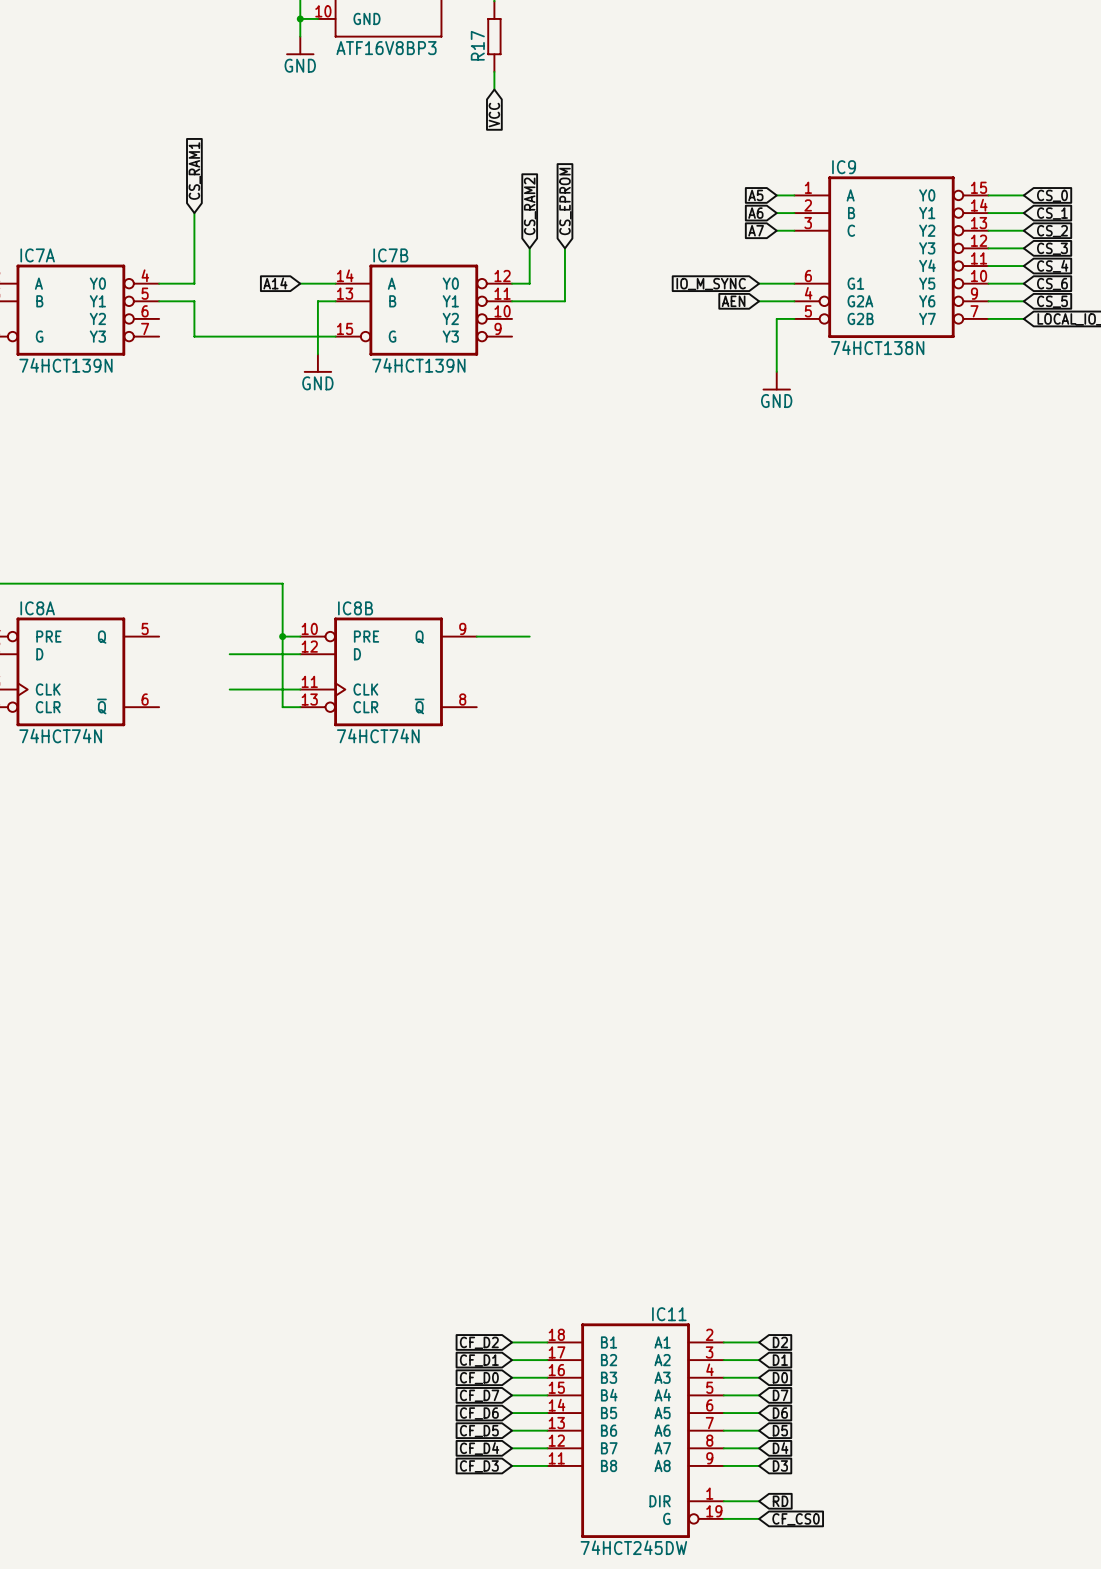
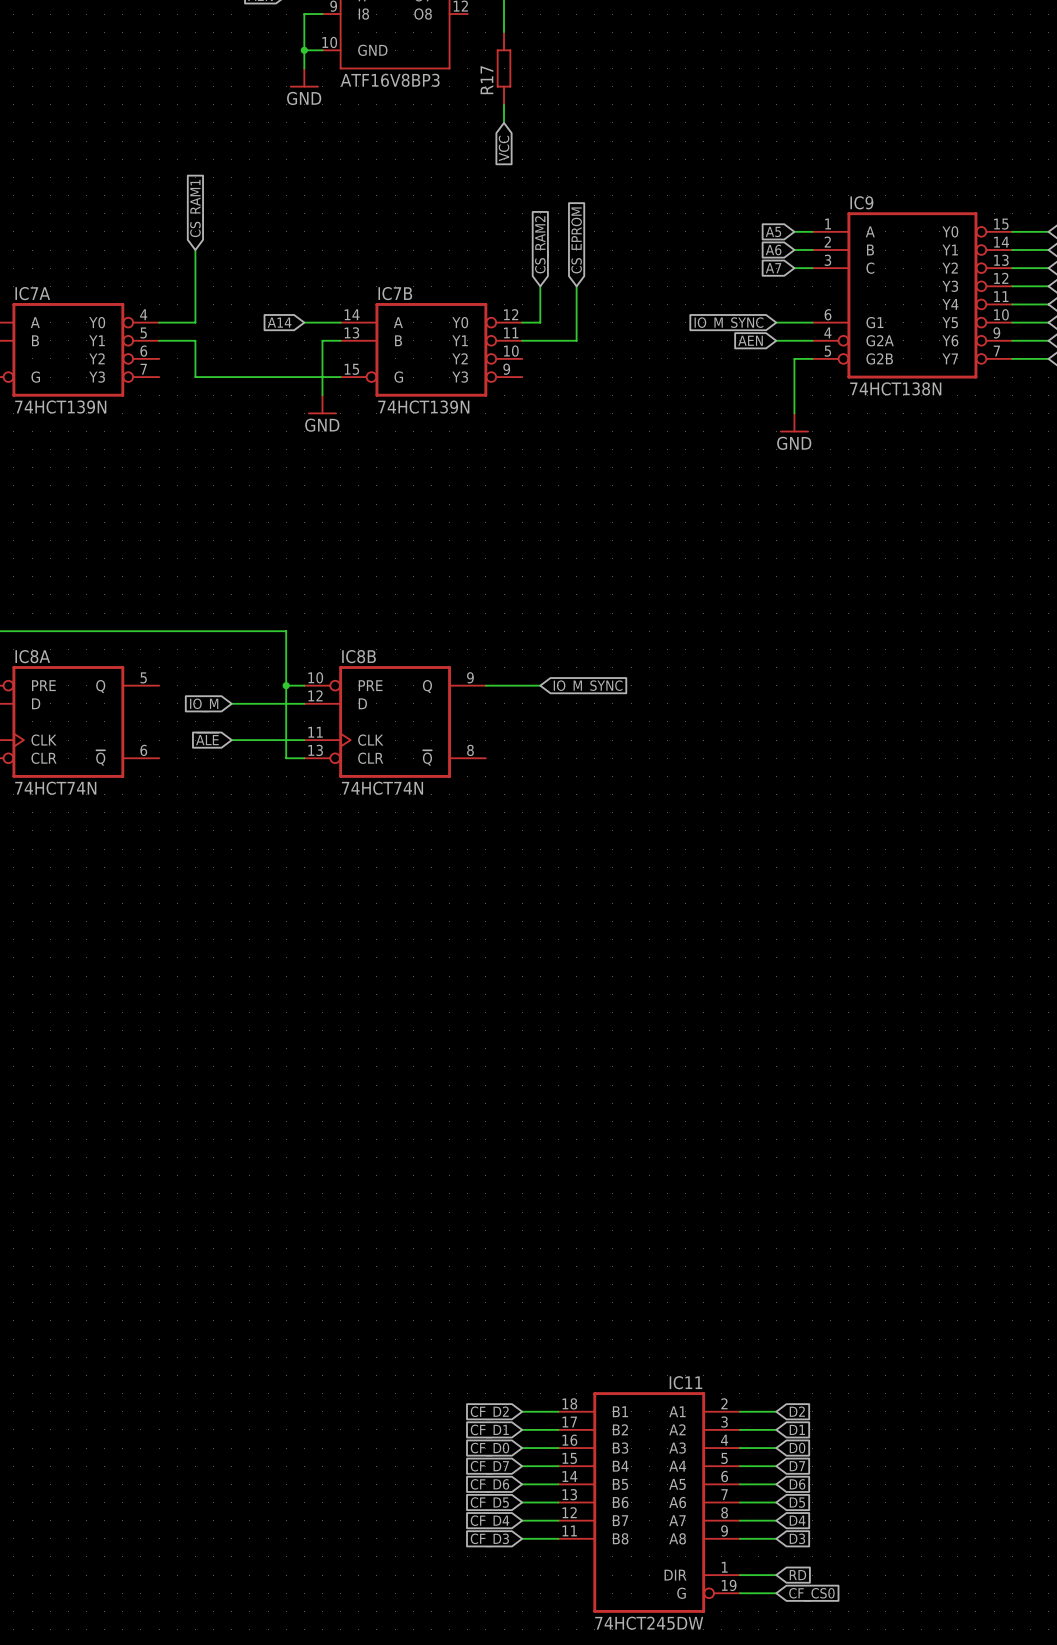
global label: none -> IO_M_SYNC (588, 687)
global label: none -> IO_M (204, 705)
global label: none -> ~{ALE} (207, 738)

